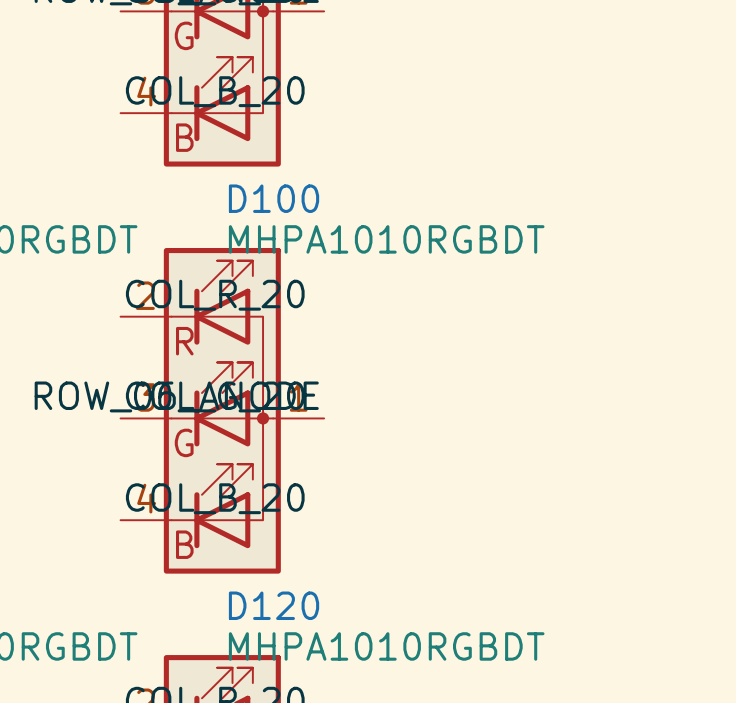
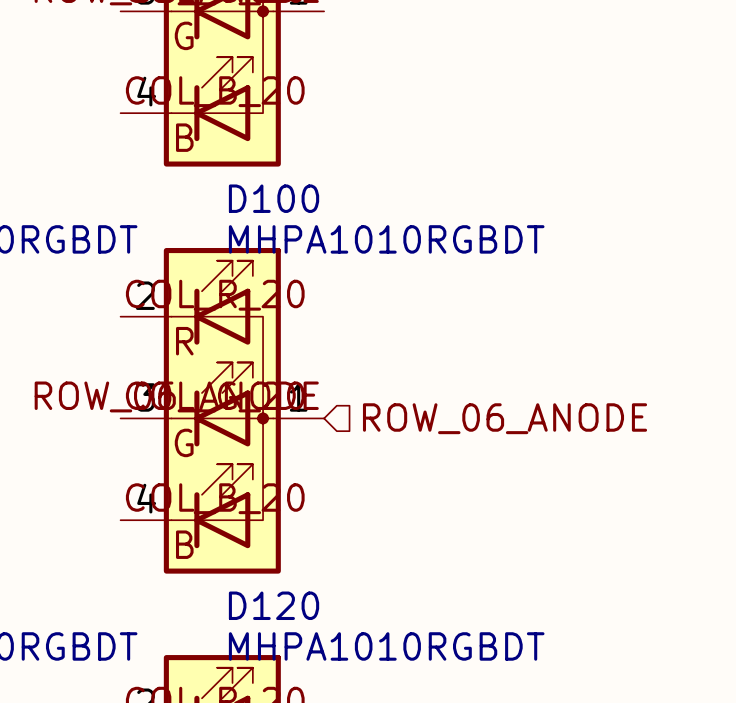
hierarchical label: none -> ROW_06_ANODE (505, 418)

